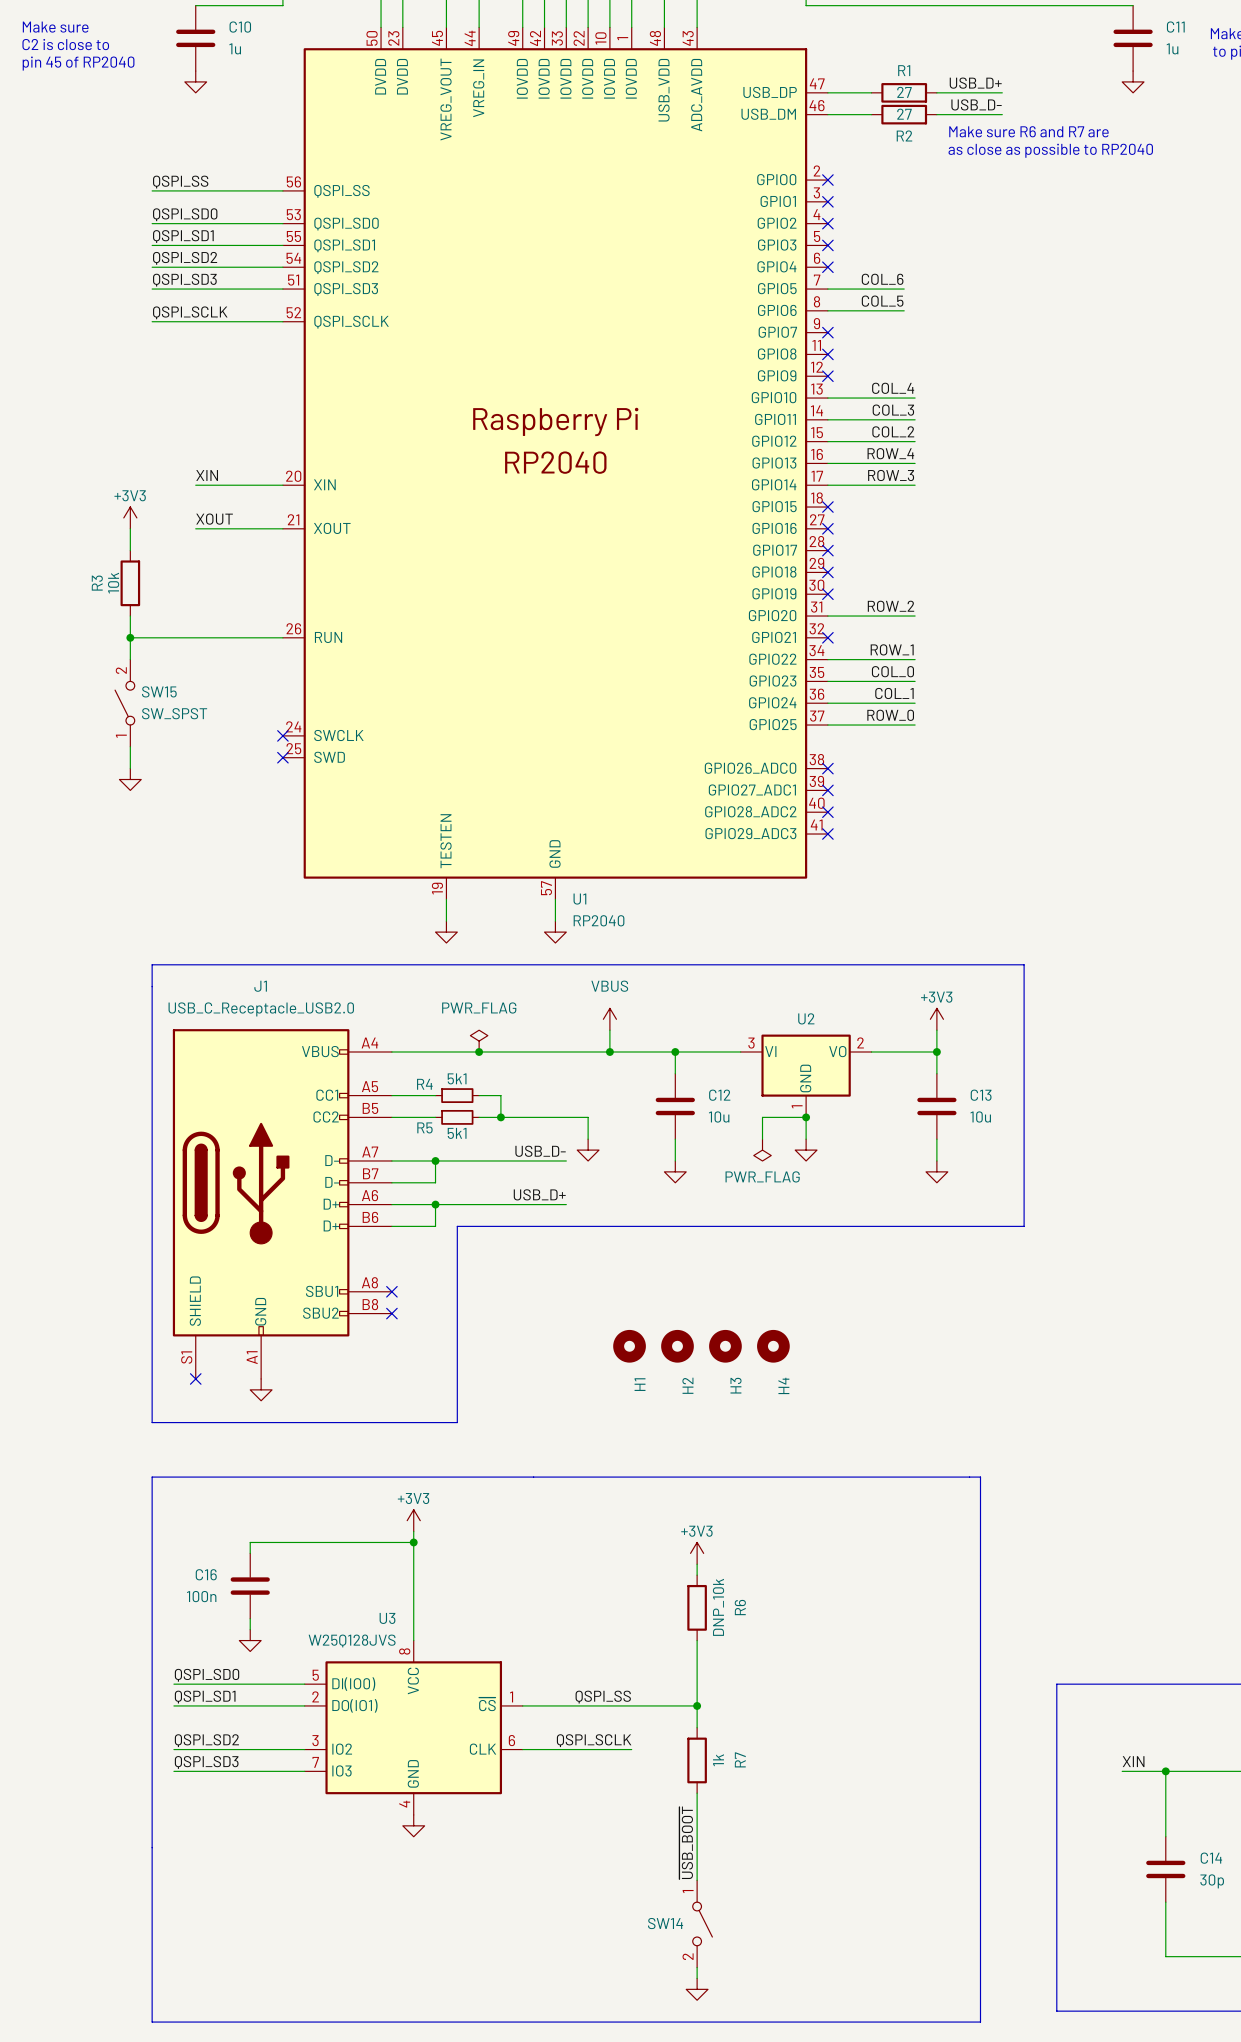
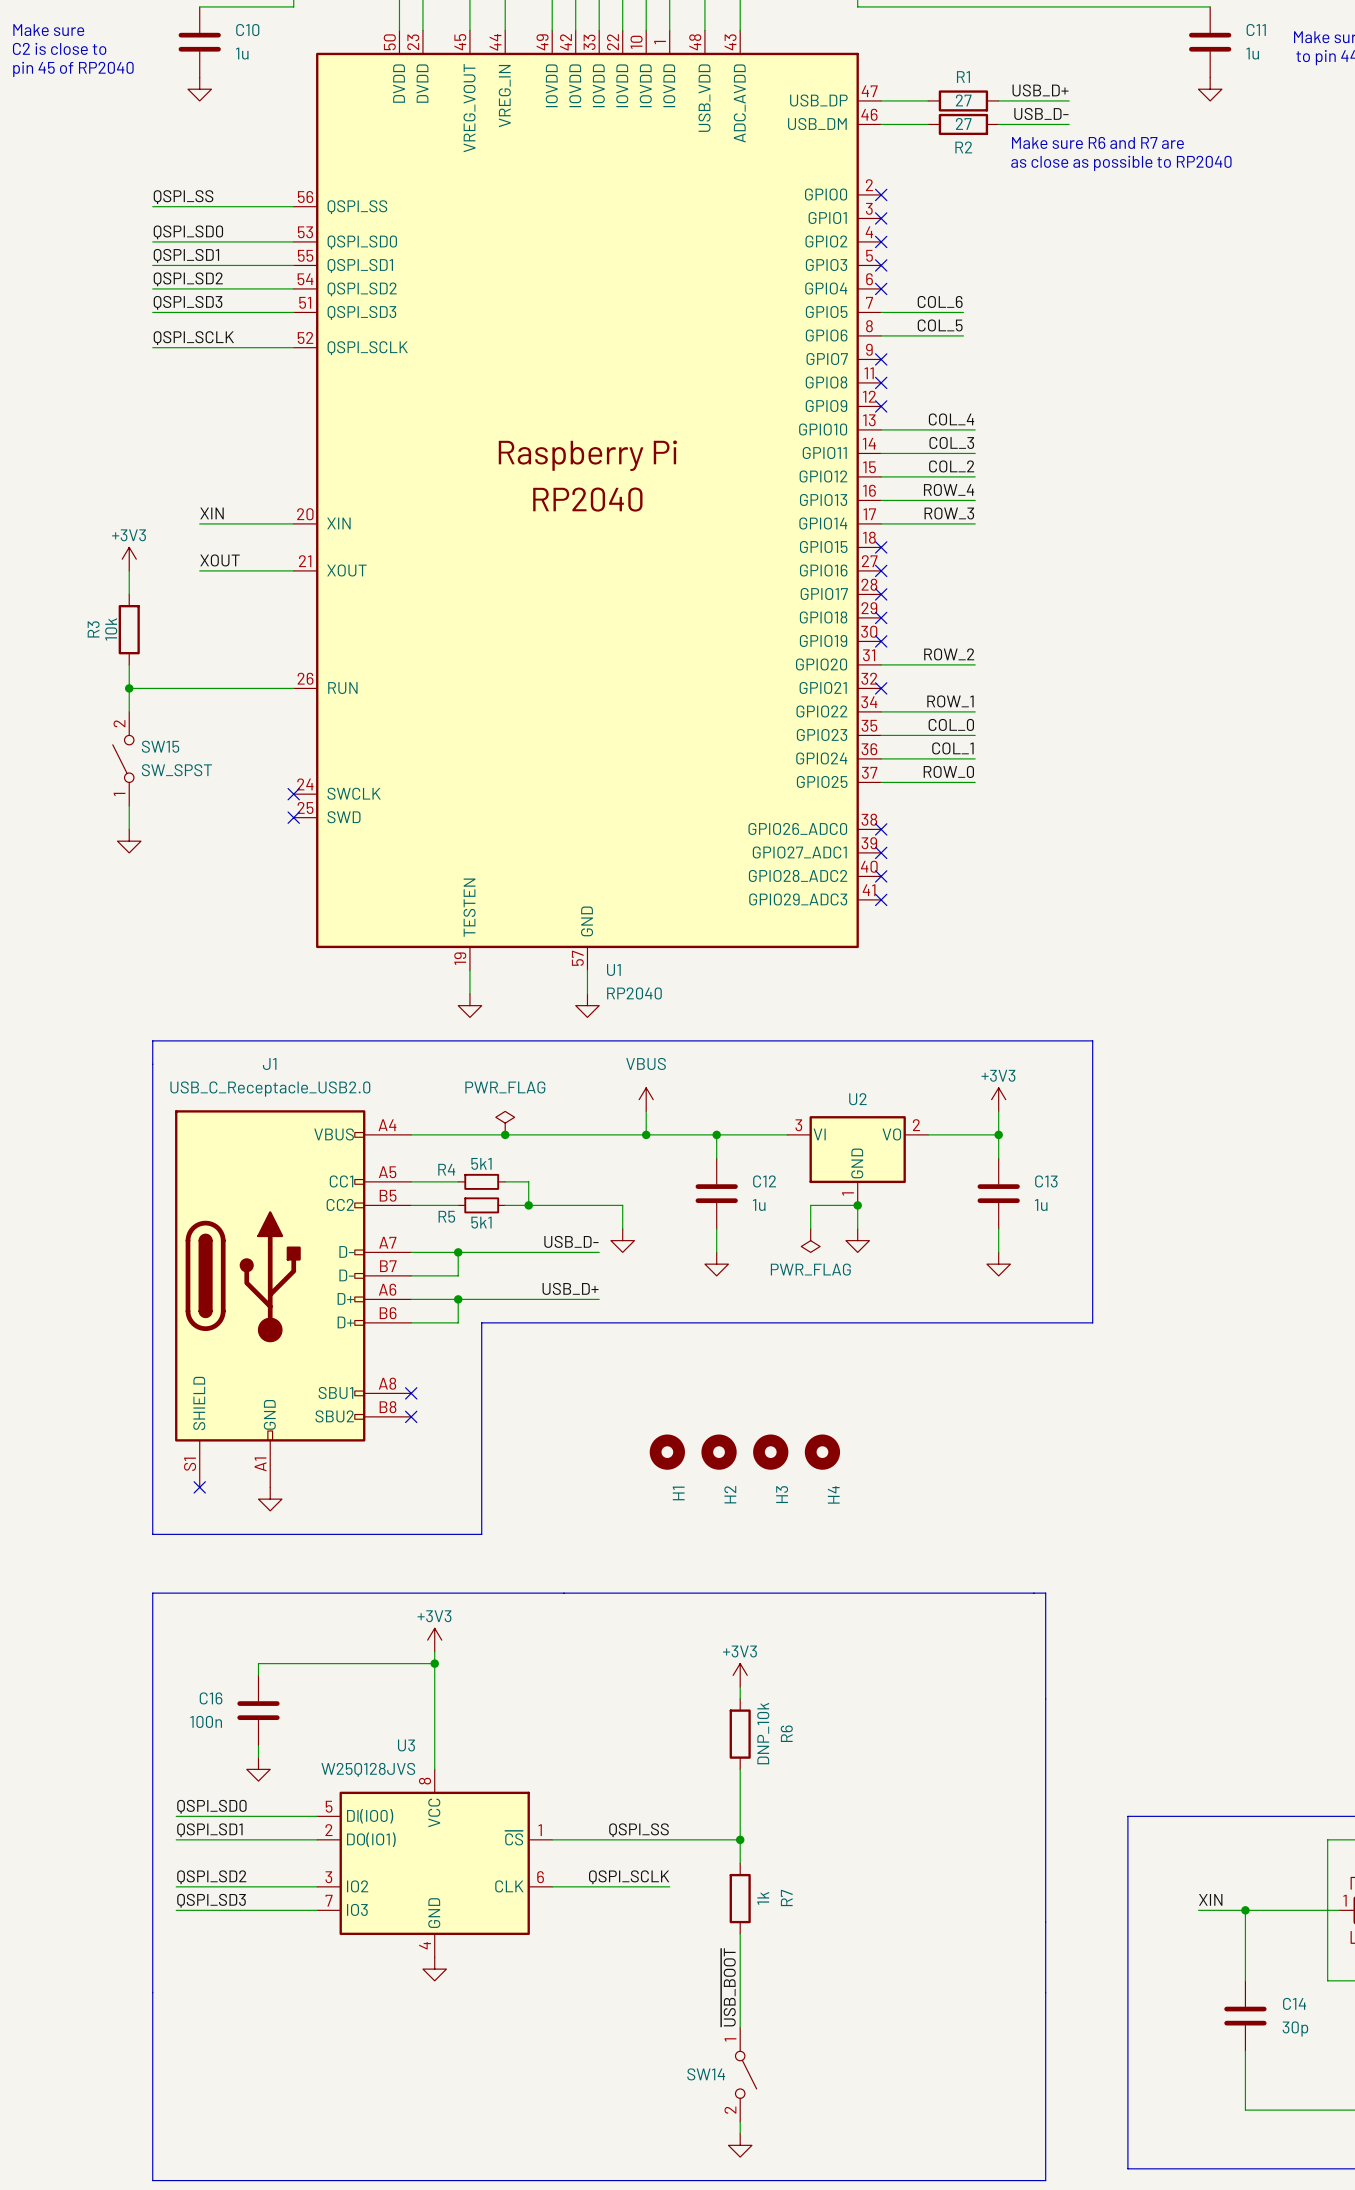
C12 value: 10u (719, 1116) -> 1u (759, 1205)
C13 value: 10u (980, 1116) -> 1u (1041, 1205)

